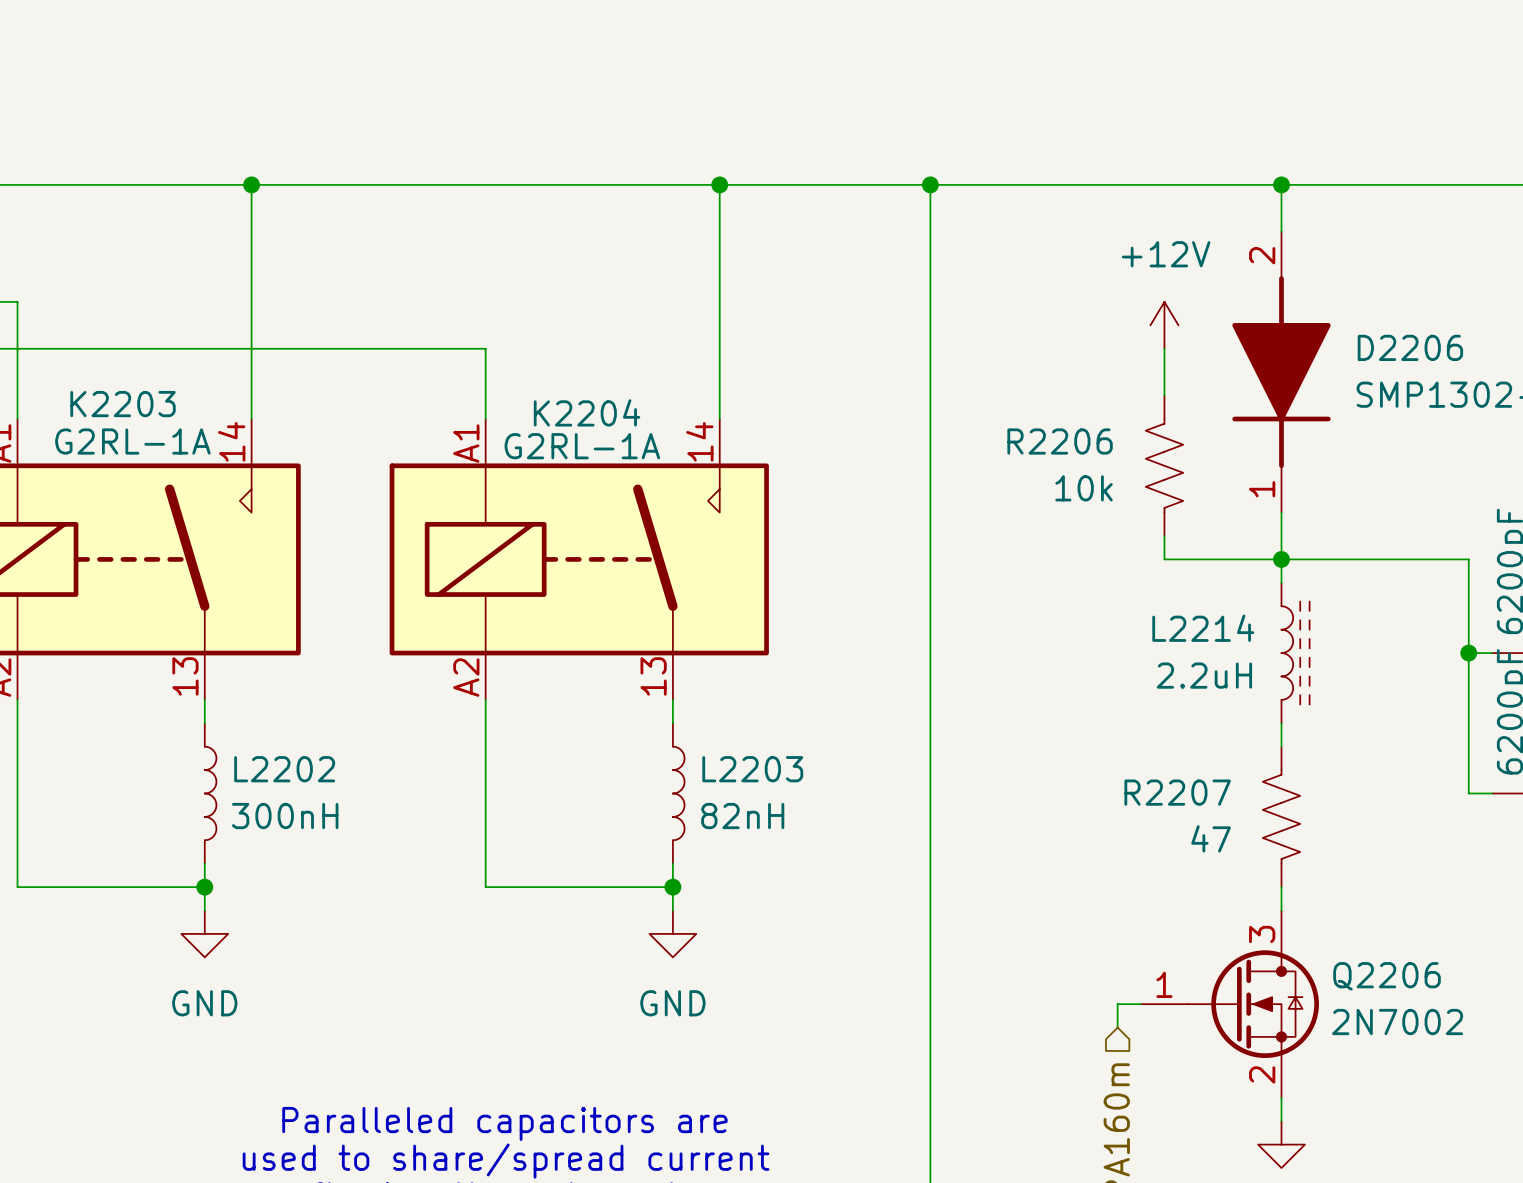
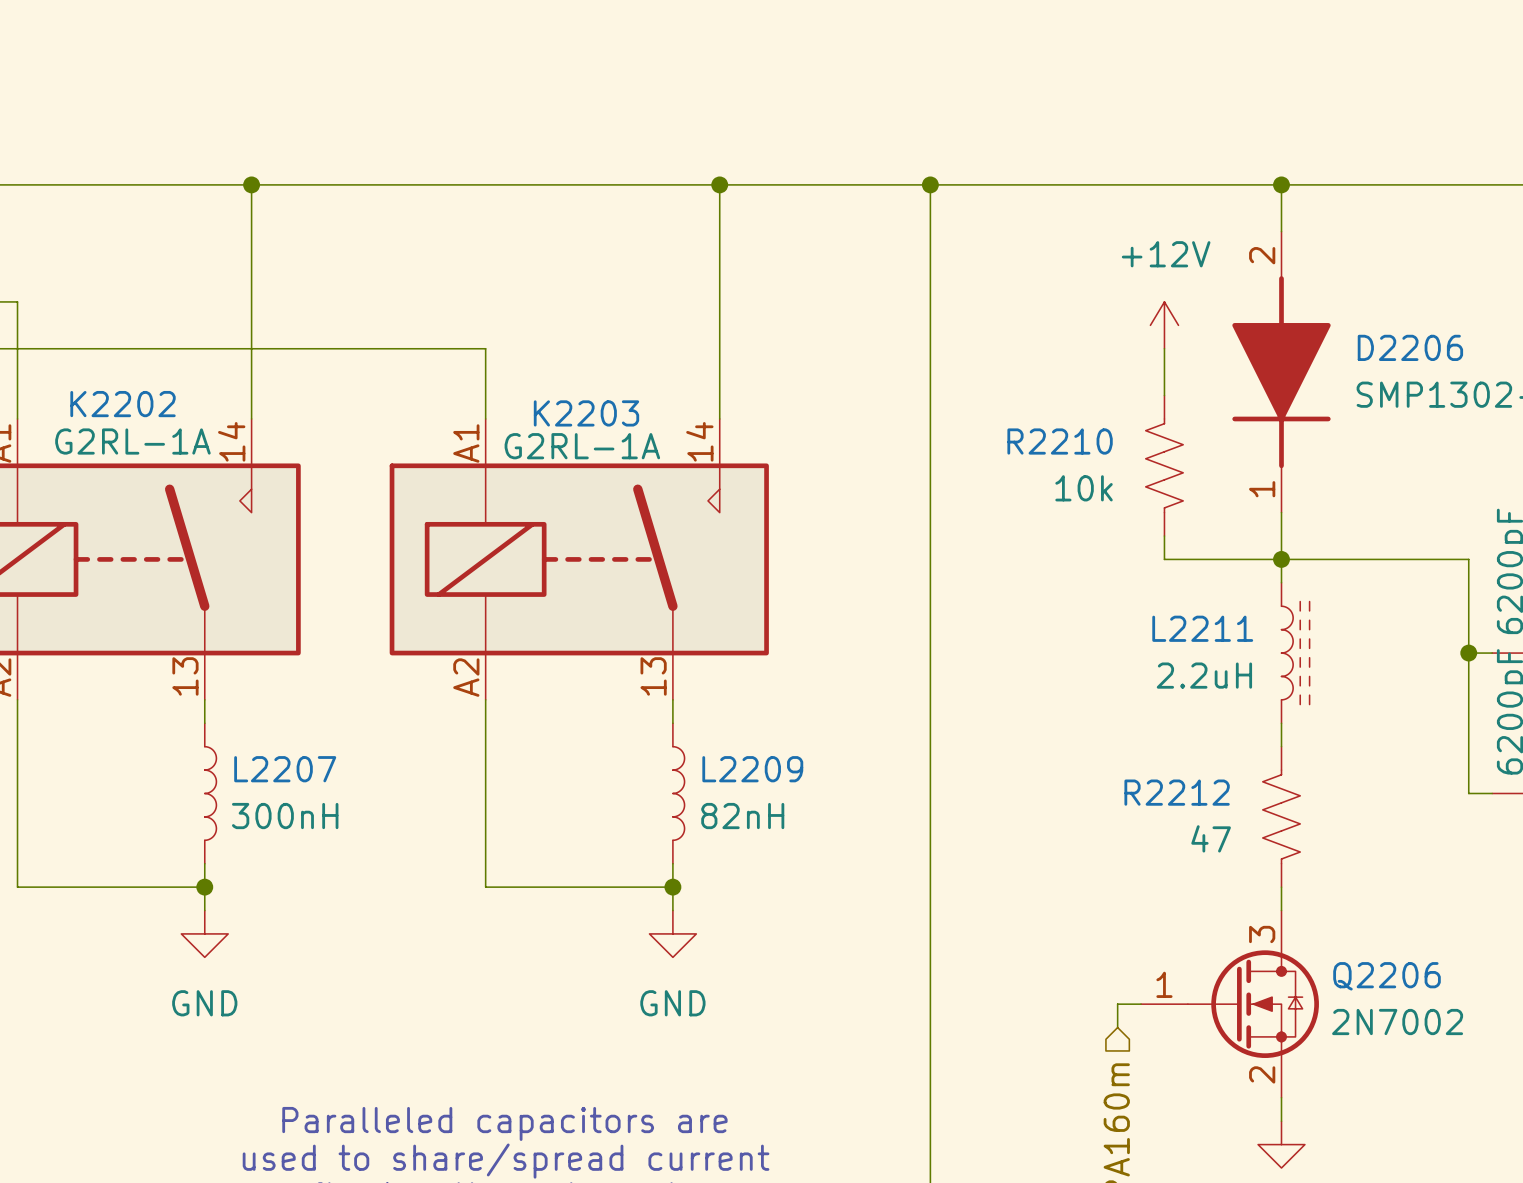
K2203 name: K2203 (123, 404) -> K2202 (123, 404)
K2204 name: K2204 (587, 412) -> K2203 (586, 413)
R2206 name: R2206 (1060, 441) -> R2210 (1060, 441)
L2214 name: L2214 (1203, 628) -> L2211 (1202, 628)
L2202 name: L2202 (284, 769) -> L2207 (285, 769)
L2203 name: L2203 (752, 769) -> L2209 (752, 769)
R2207 name: R2207 (1177, 792) -> R2212 (1177, 792)

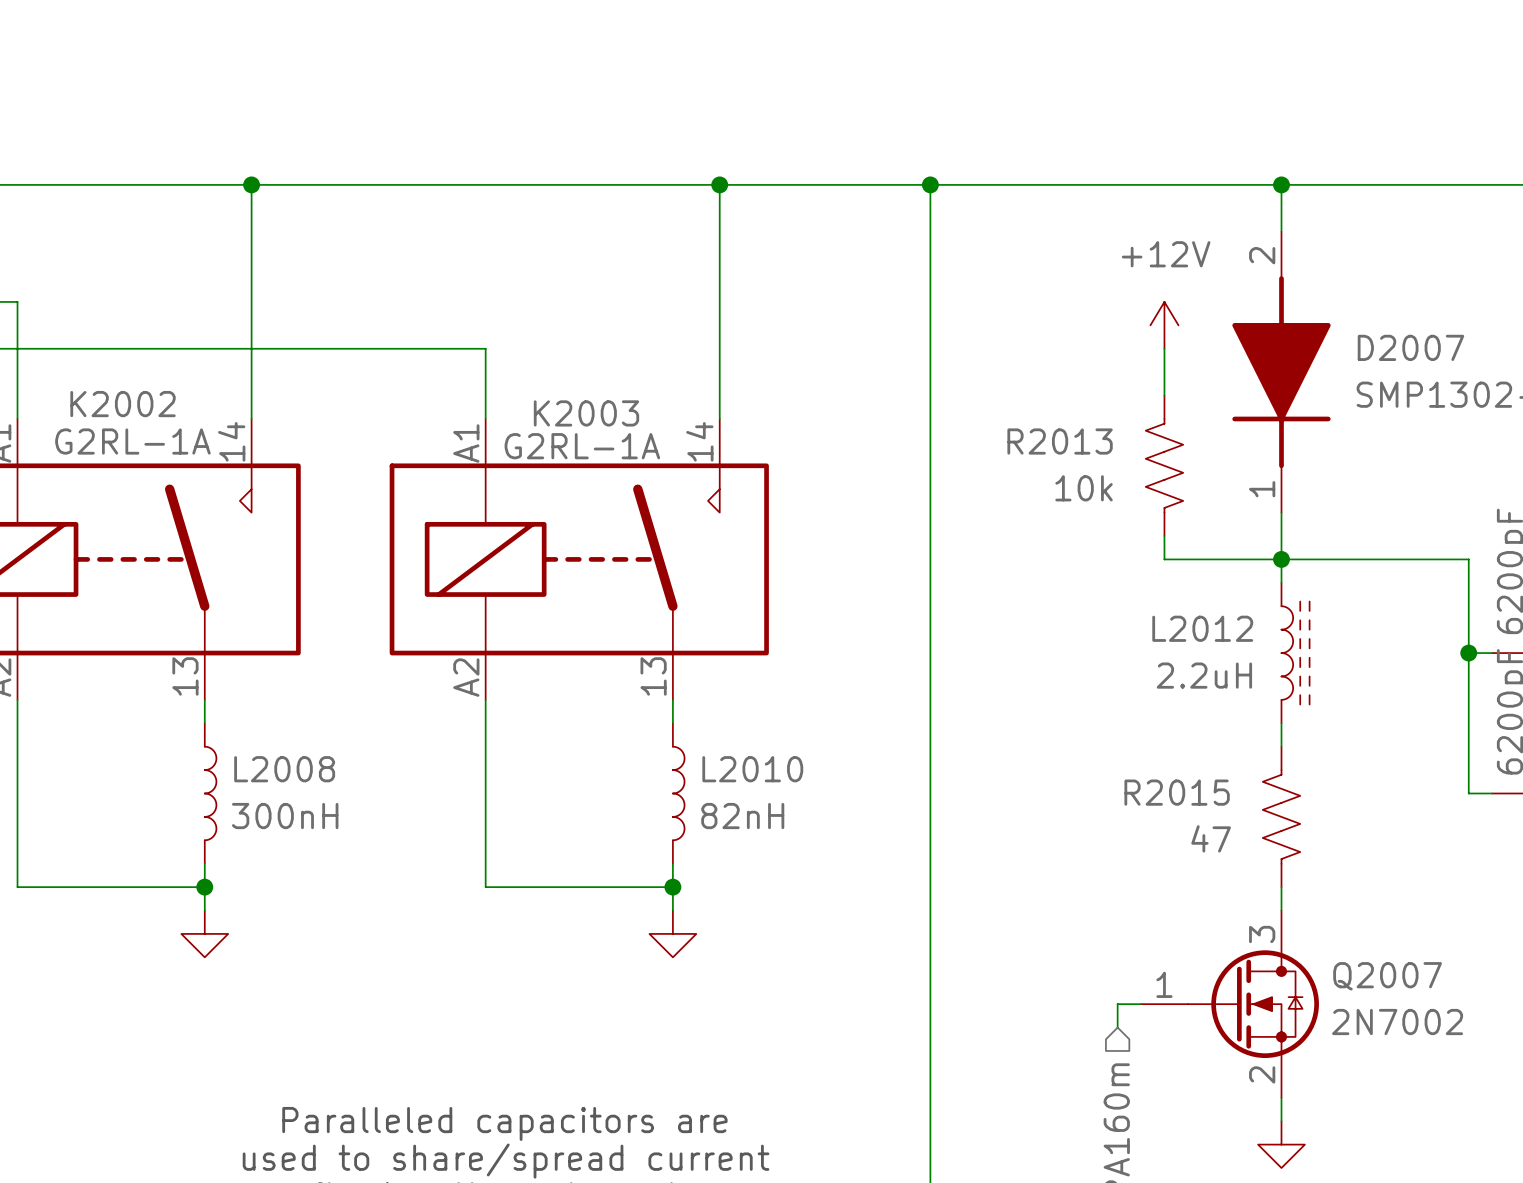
D2206 name: D2206 (1410, 347) -> D2007 (1410, 347)
K2202 name: K2202 (123, 404) -> K2002 (123, 404)
K2203 name: K2203 (586, 413) -> K2003 (586, 413)
R2210 name: R2210 (1060, 441) -> R2013 (1060, 441)
L2211 name: L2211 (1202, 628) -> L2012 (1202, 628)
L2207 name: L2207 (285, 769) -> L2008 (284, 769)
L2209 name: L2209 (752, 769) -> L2010 (752, 769)
R2212 name: R2212 (1177, 792) -> R2015 (1177, 792)
Q2206 name: Q2206 (1387, 976) -> Q2007 (1387, 976)
power symbol text: GND (204, 1003) -> none
power symbol text: GND (672, 1003) -> none

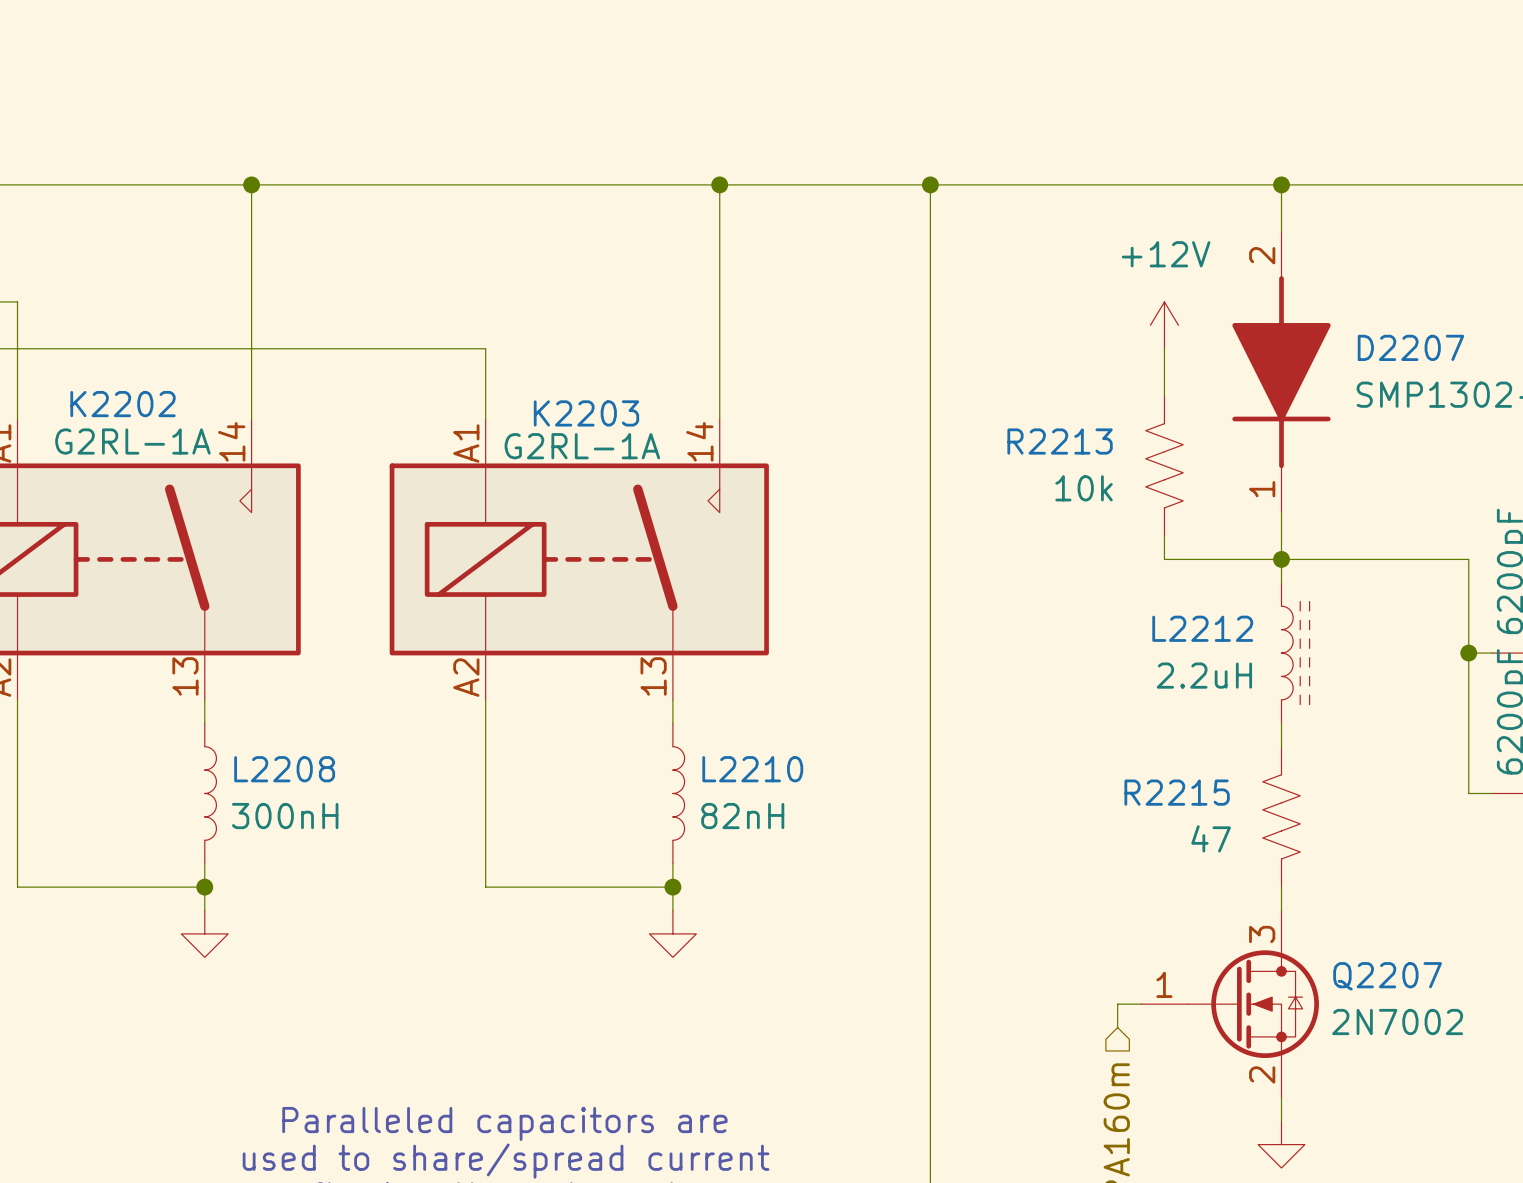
D2007 name: D2007 (1410, 347) -> D2207 (1410, 347)
K2002 name: K2002 (123, 404) -> K2202 (123, 404)
K2003 name: K2003 (586, 413) -> K2203 (586, 413)
R2013 name: R2013 (1060, 441) -> R2213 (1060, 441)
L2012 name: L2012 (1202, 628) -> L2212 (1202, 628)
L2008 name: L2008 (284, 769) -> L2208 (284, 769)
L2010 name: L2010 (752, 769) -> L2210 (752, 769)
R2015 name: R2015 (1177, 792) -> R2215 (1177, 792)
Q2007 name: Q2007 (1387, 976) -> Q2207 (1387, 976)

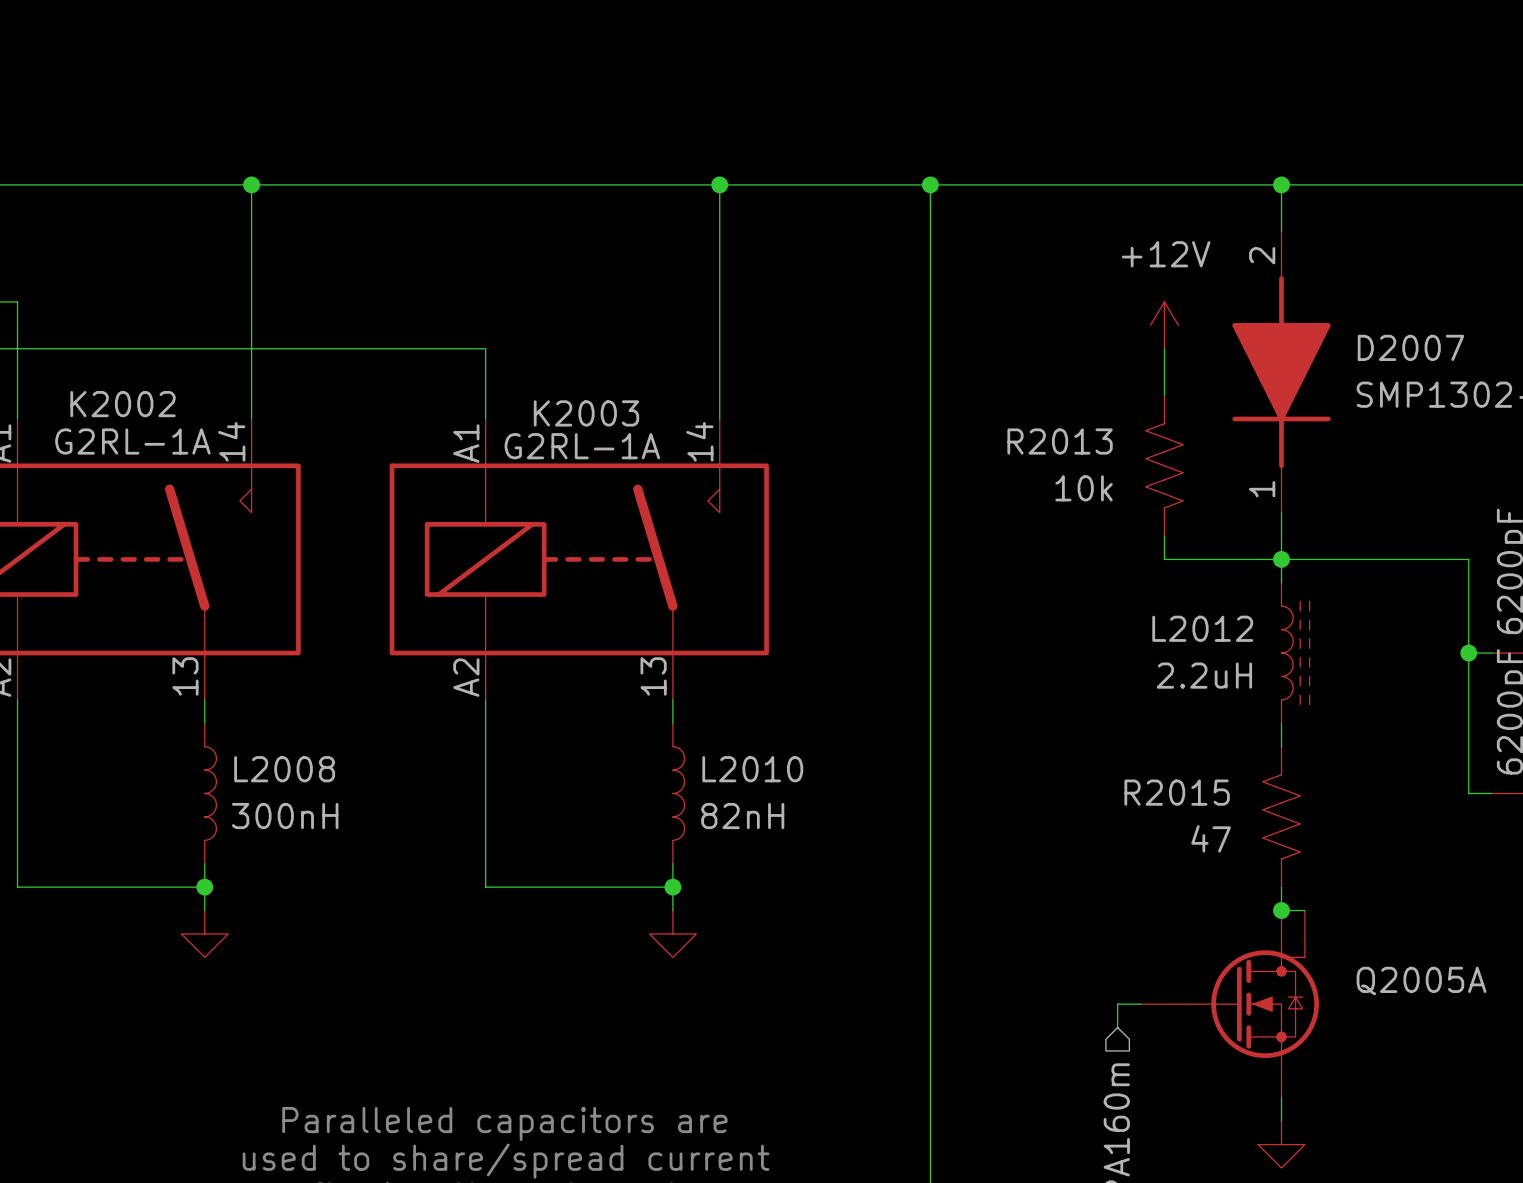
D2207 name: D2207 (1410, 347) -> D2007 (1410, 347)
K2202 name: K2202 (123, 404) -> K2002 (123, 404)
K2203 name: K2203 (586, 413) -> K2003 (586, 413)
R2213 name: R2213 (1060, 441) -> R2013 (1060, 441)
L2212 name: L2212 (1202, 628) -> L2012 (1202, 628)
L2208 name: L2208 (284, 769) -> L2008 (284, 769)
L2210 name: L2210 (752, 769) -> L2010 (752, 769)
R2215 name: R2215 (1177, 792) -> R2015 (1177, 792)
wire: none -> (1281, 910) (1304, 910)
junction: none -> (1281, 910)
Q2207: 2N7002 (1230, 1004) -> none
Q2005A: none -> (1230, 1004)

